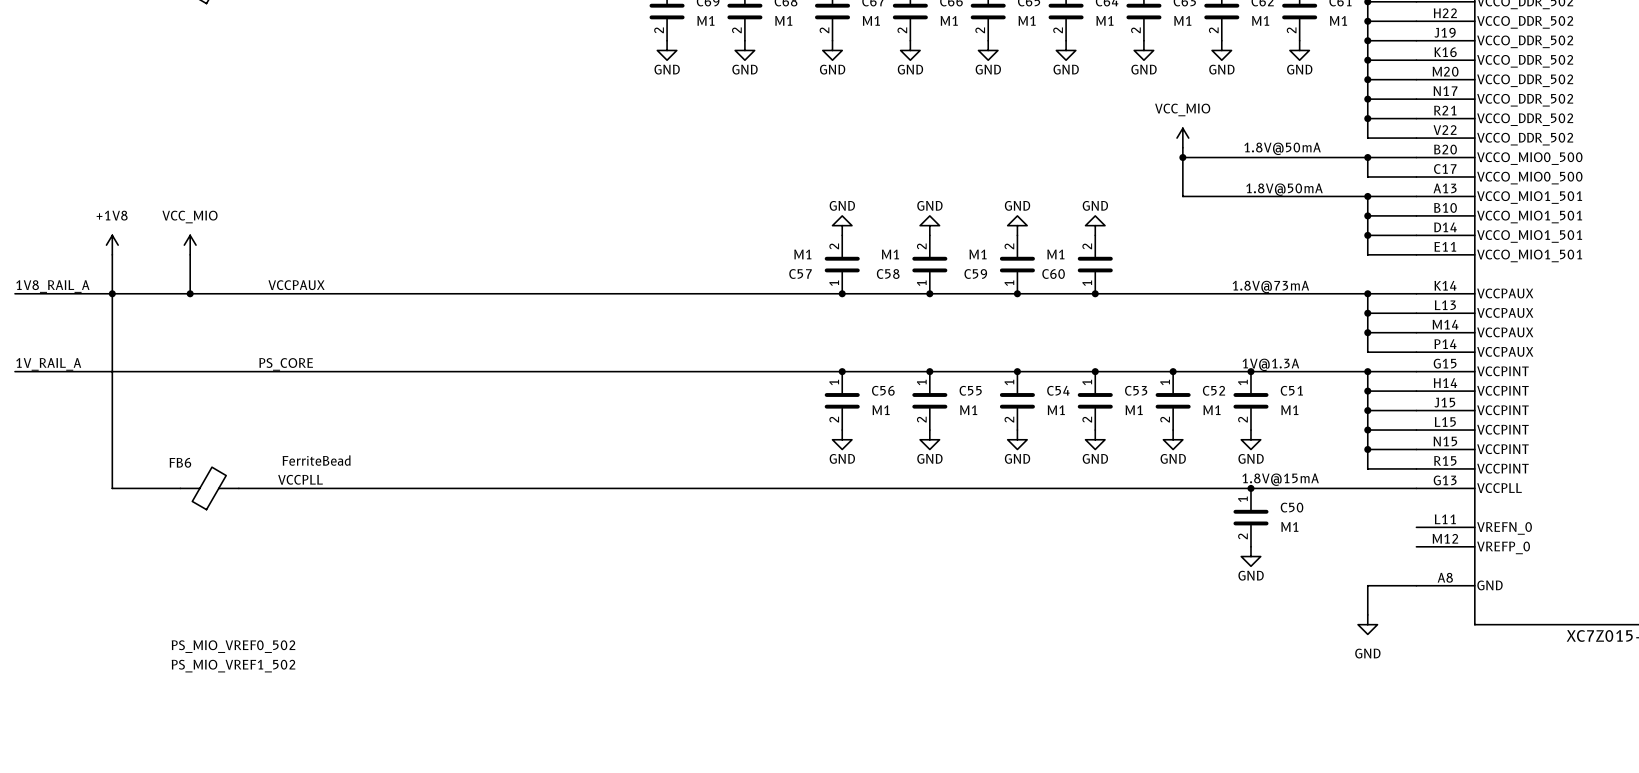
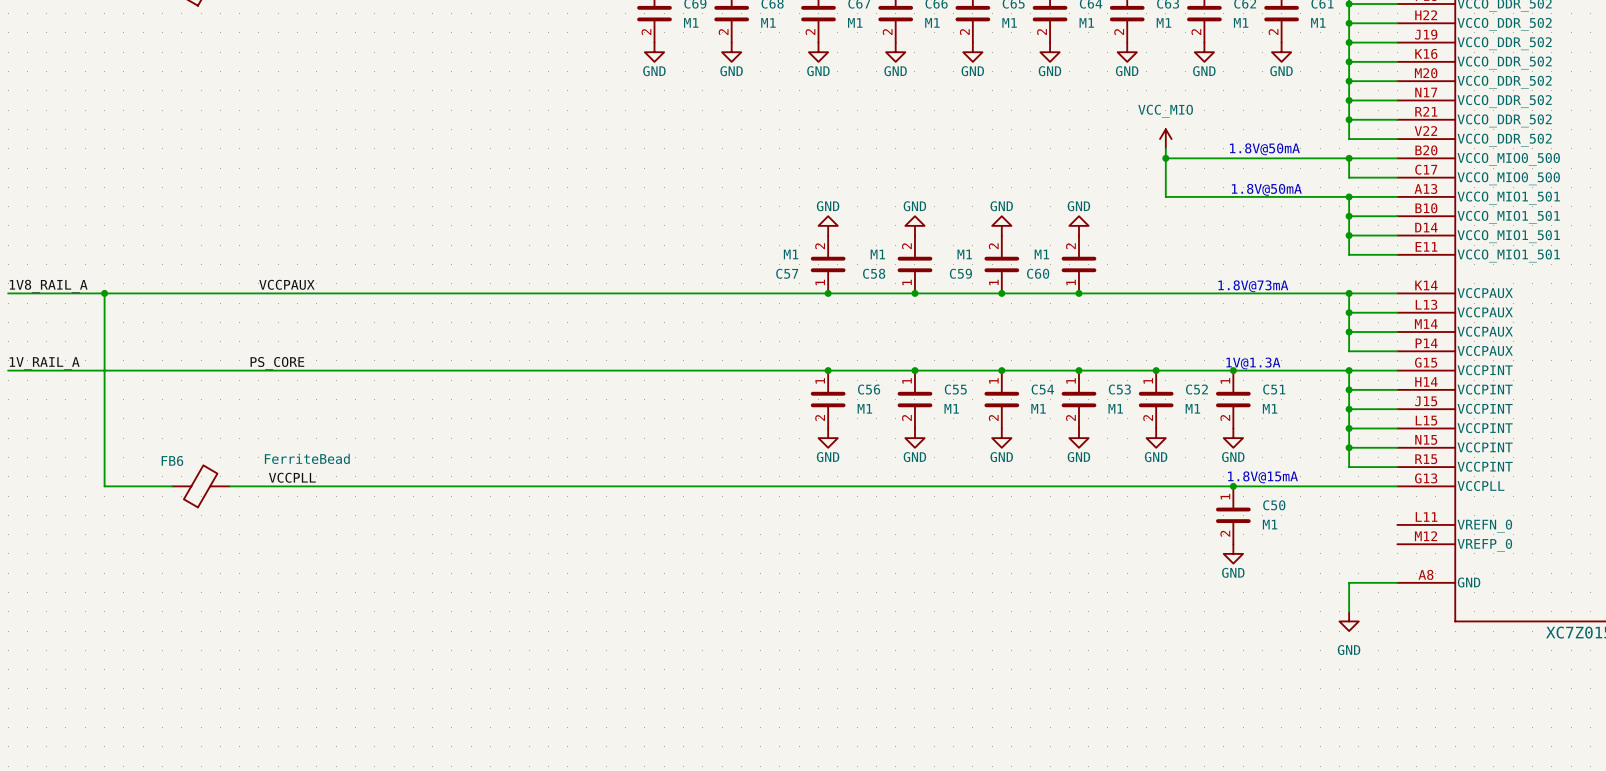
power symbol: +1V8 (112, 245) -> none
power symbol: VCC_MIO (190, 245) -> none
wire: (112, 254) (112, 293) -> none
wire: (190, 254) (190, 293) -> none
junction: (190, 293) -> none
label: PS_MIO_VREF0_502 (233, 646) -> none
label: PS_MIO_VREF1_502 (233, 666) -> none

